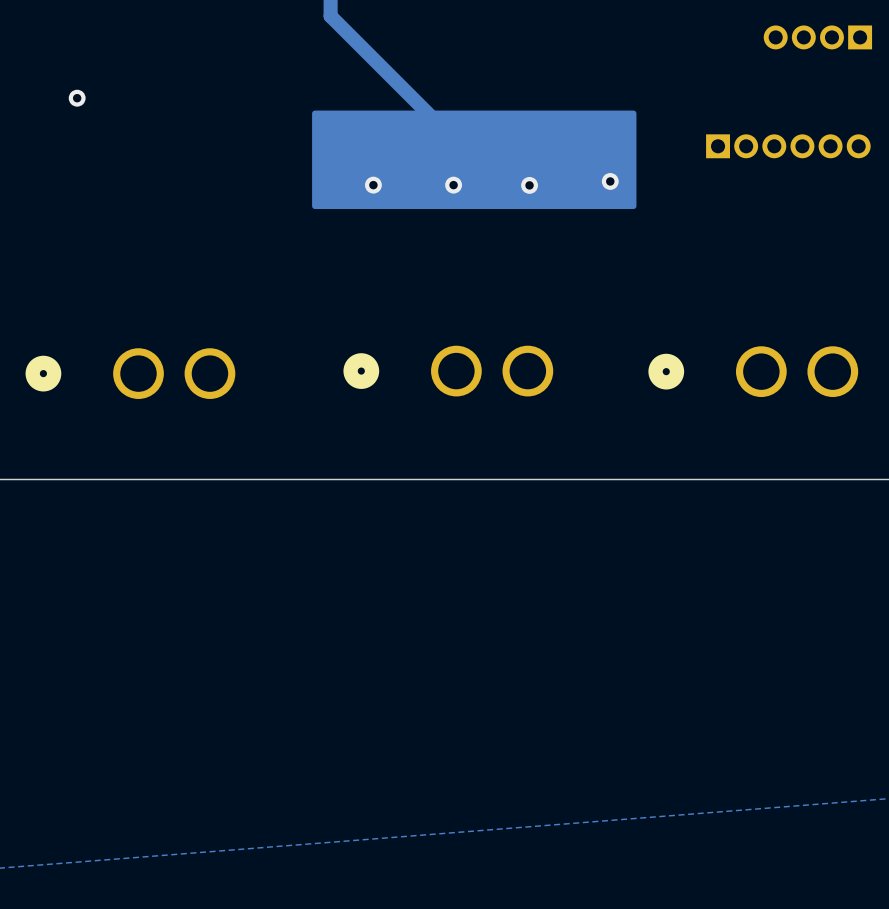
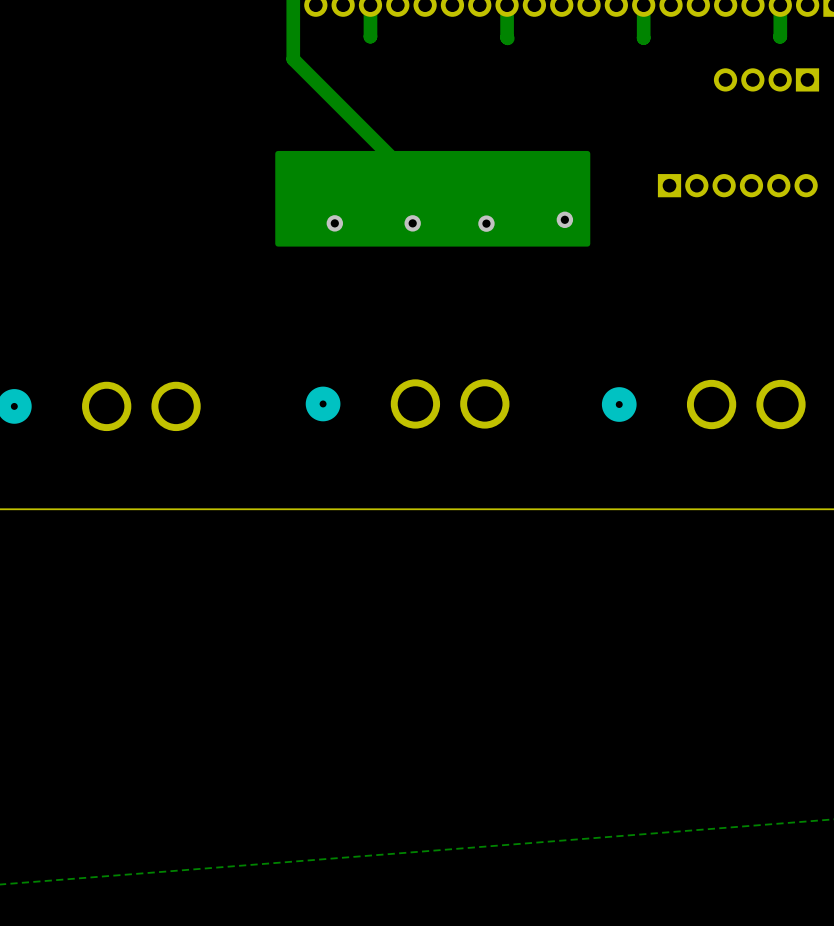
via: (77, 98) -> none

